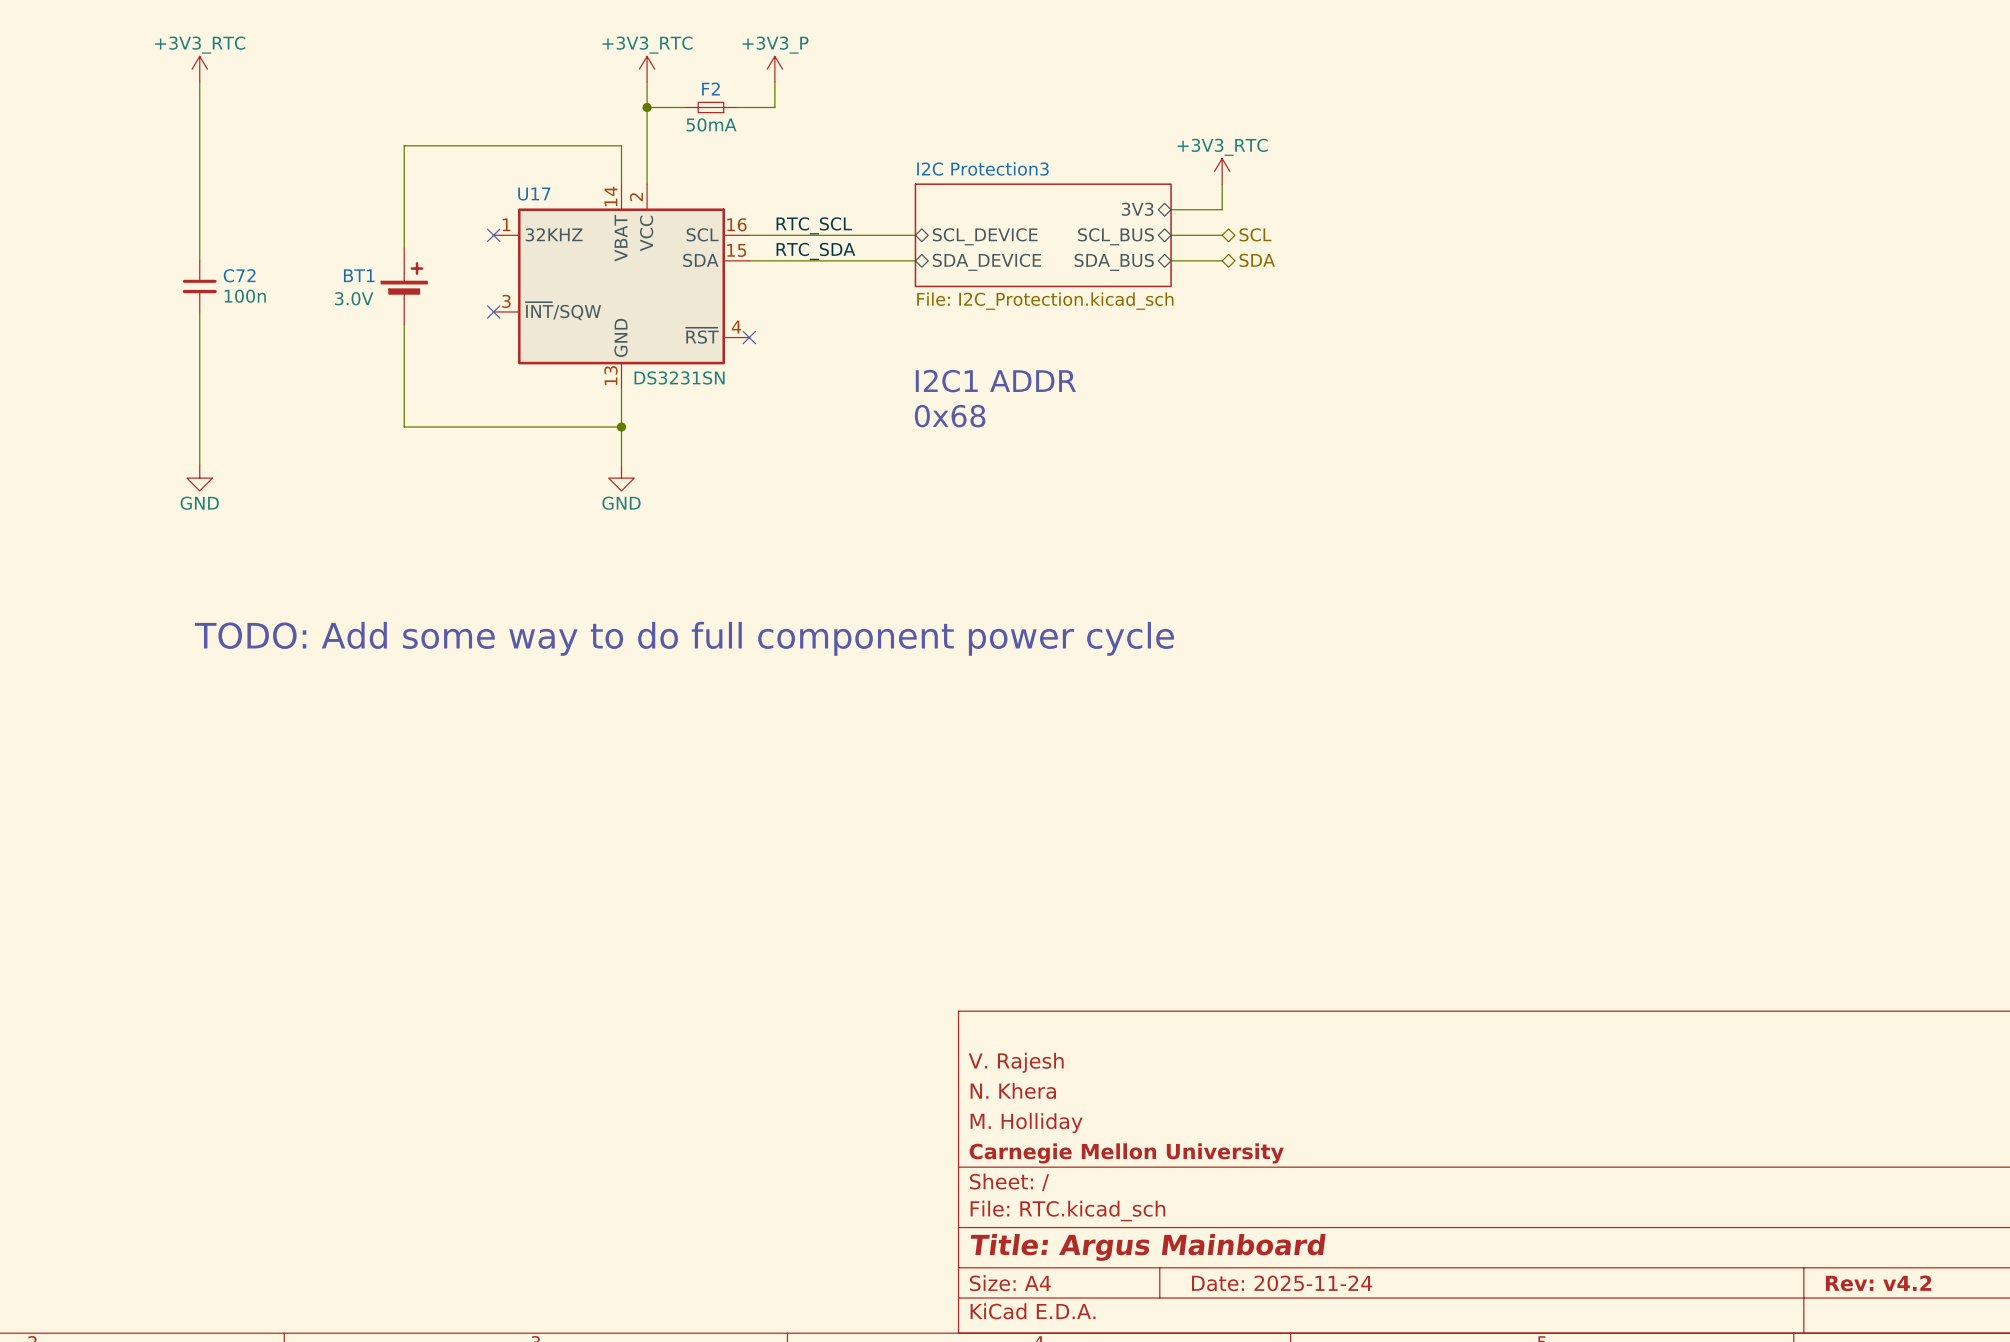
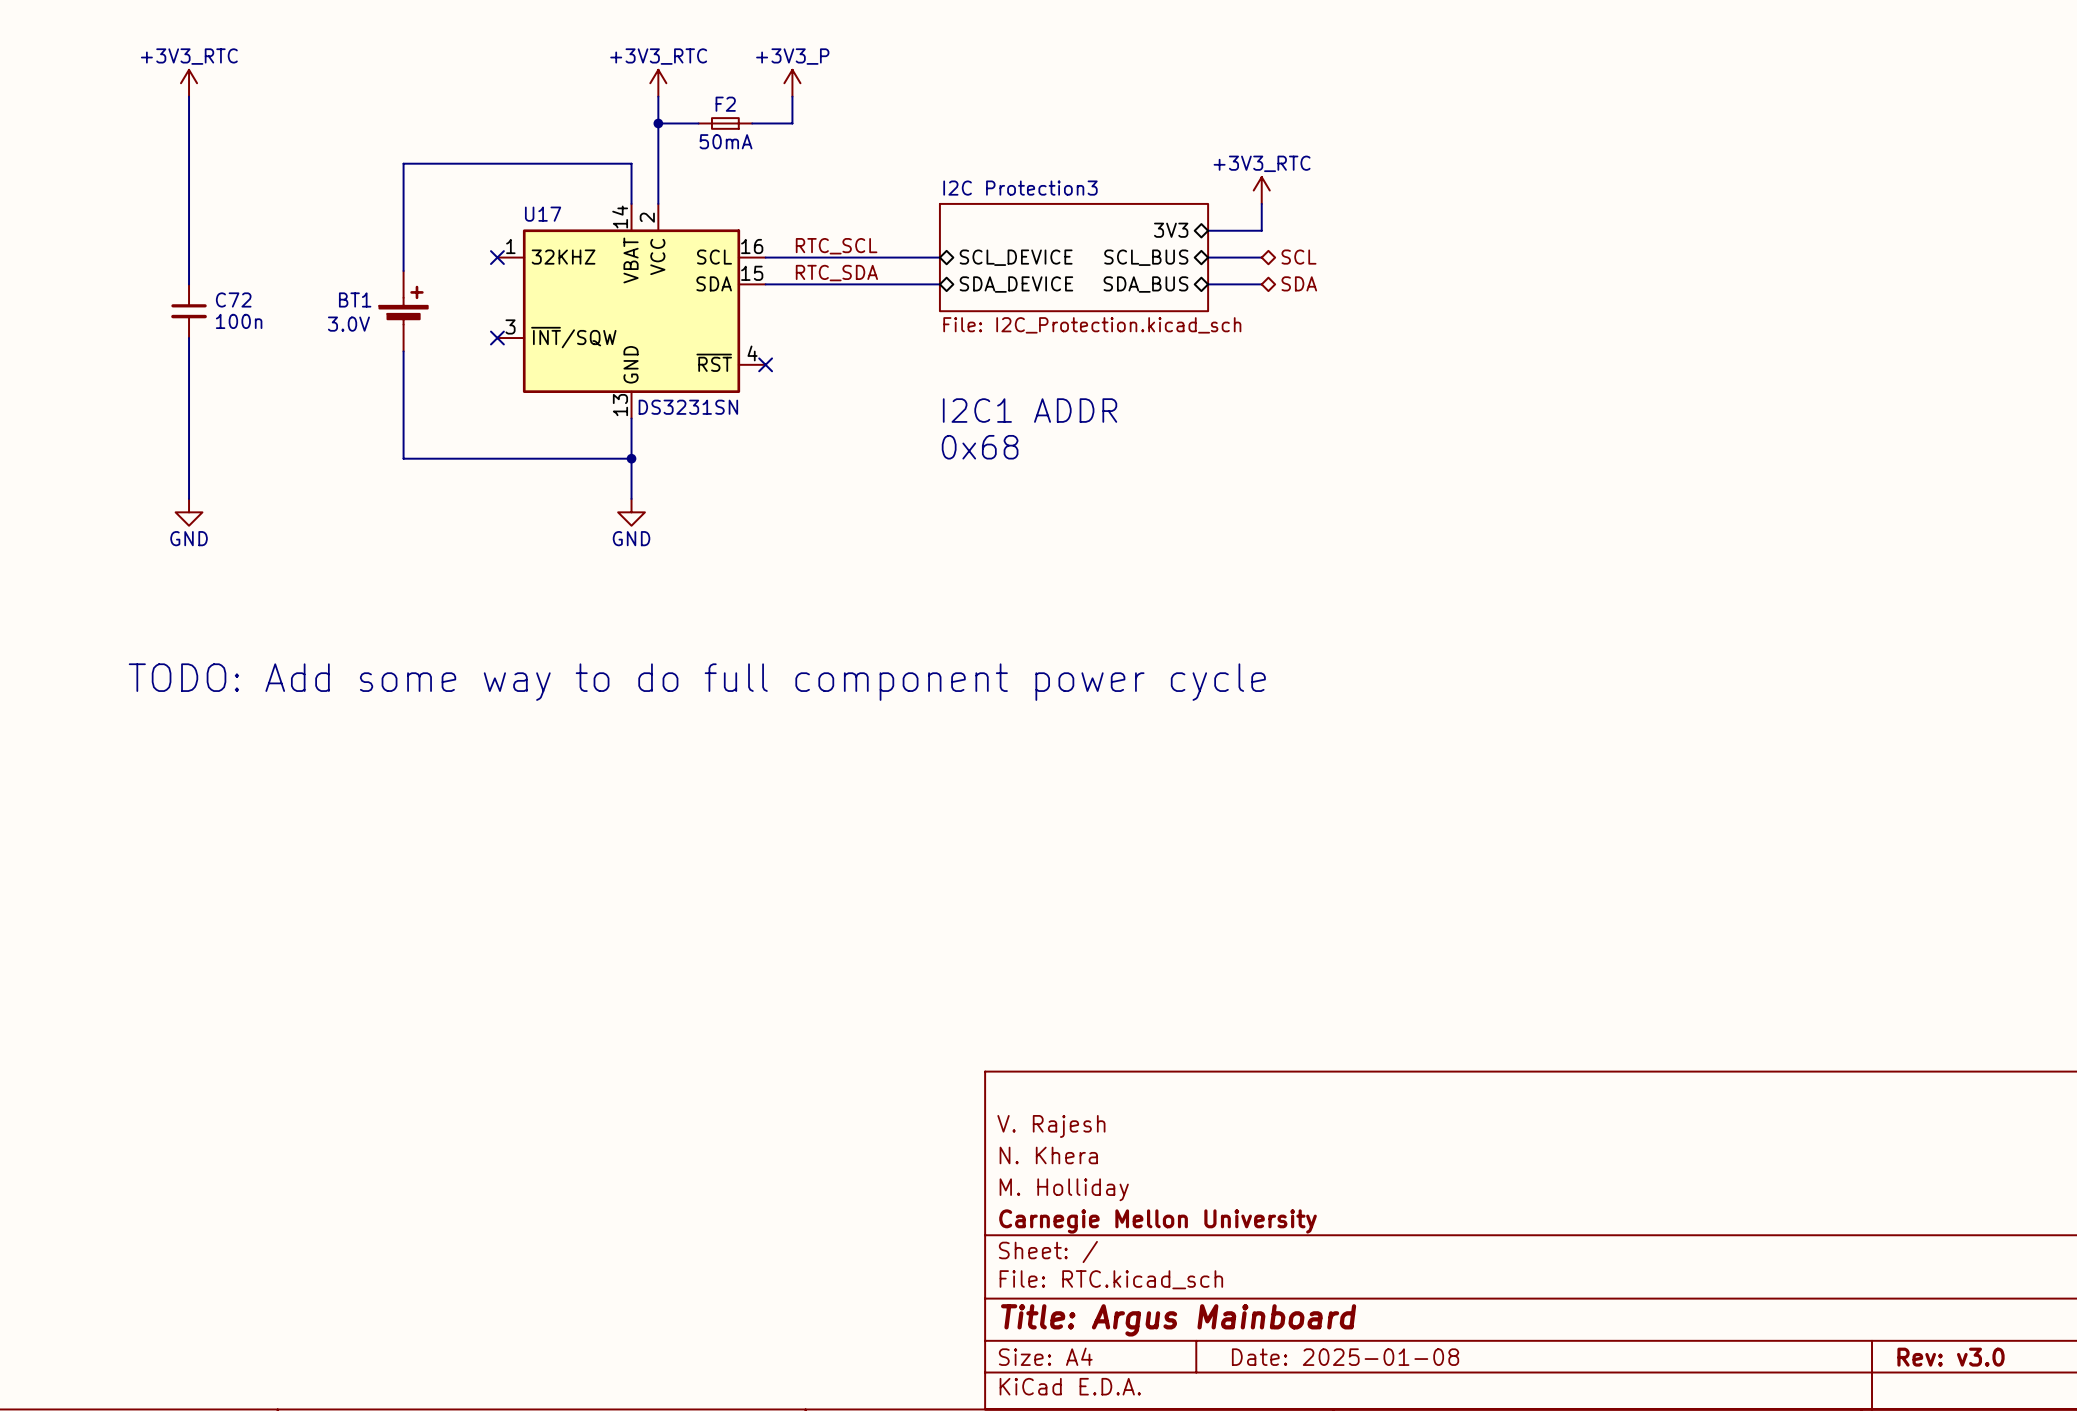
title block: Date: 2025-11-24 (1282, 1283) -> Date: 2025-01-08 (1345, 1357)
title block: Rev: v4.2 (1878, 1283) -> Rev: v3.0 (1951, 1357)

